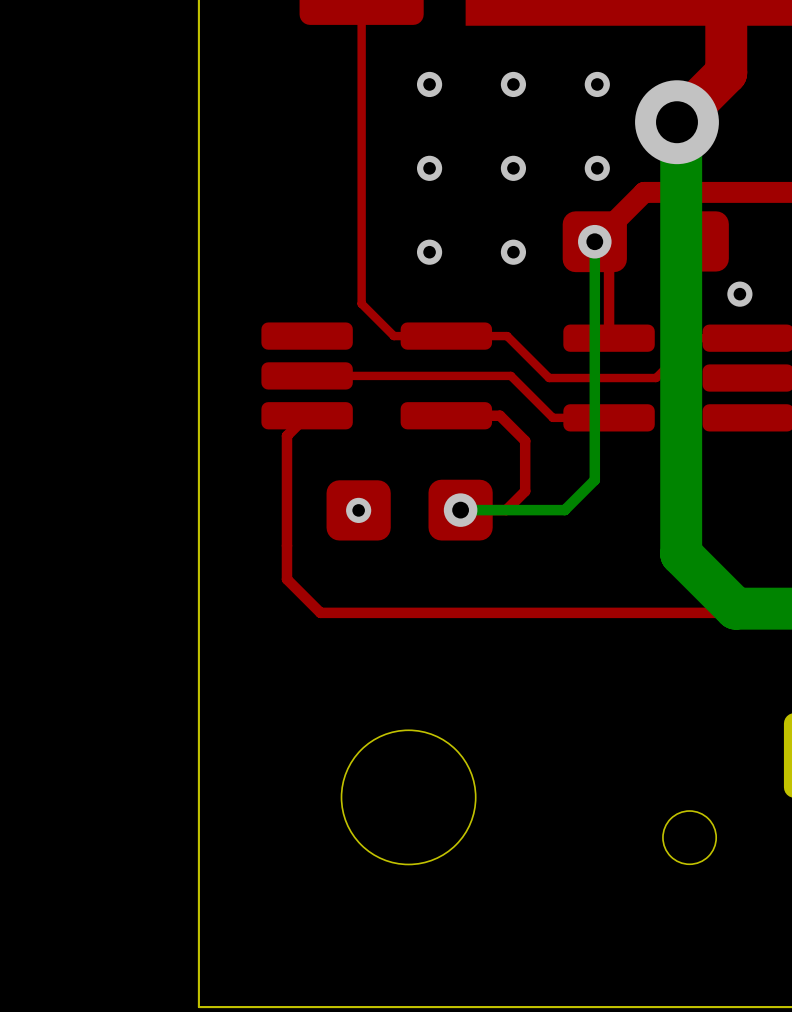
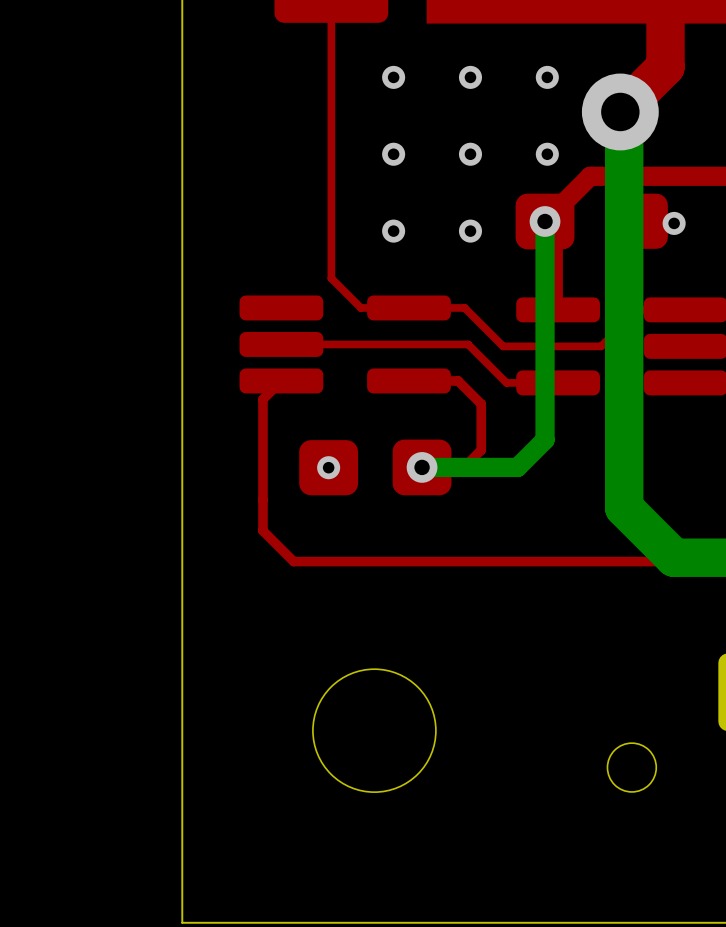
bottom track width: thin (594, 241) (594, 480) (564, 510) (460, 510) -> thick (545, 221) (545, 439) (517, 467) (422, 467)
via position: (739, 294) -> (674, 223)

